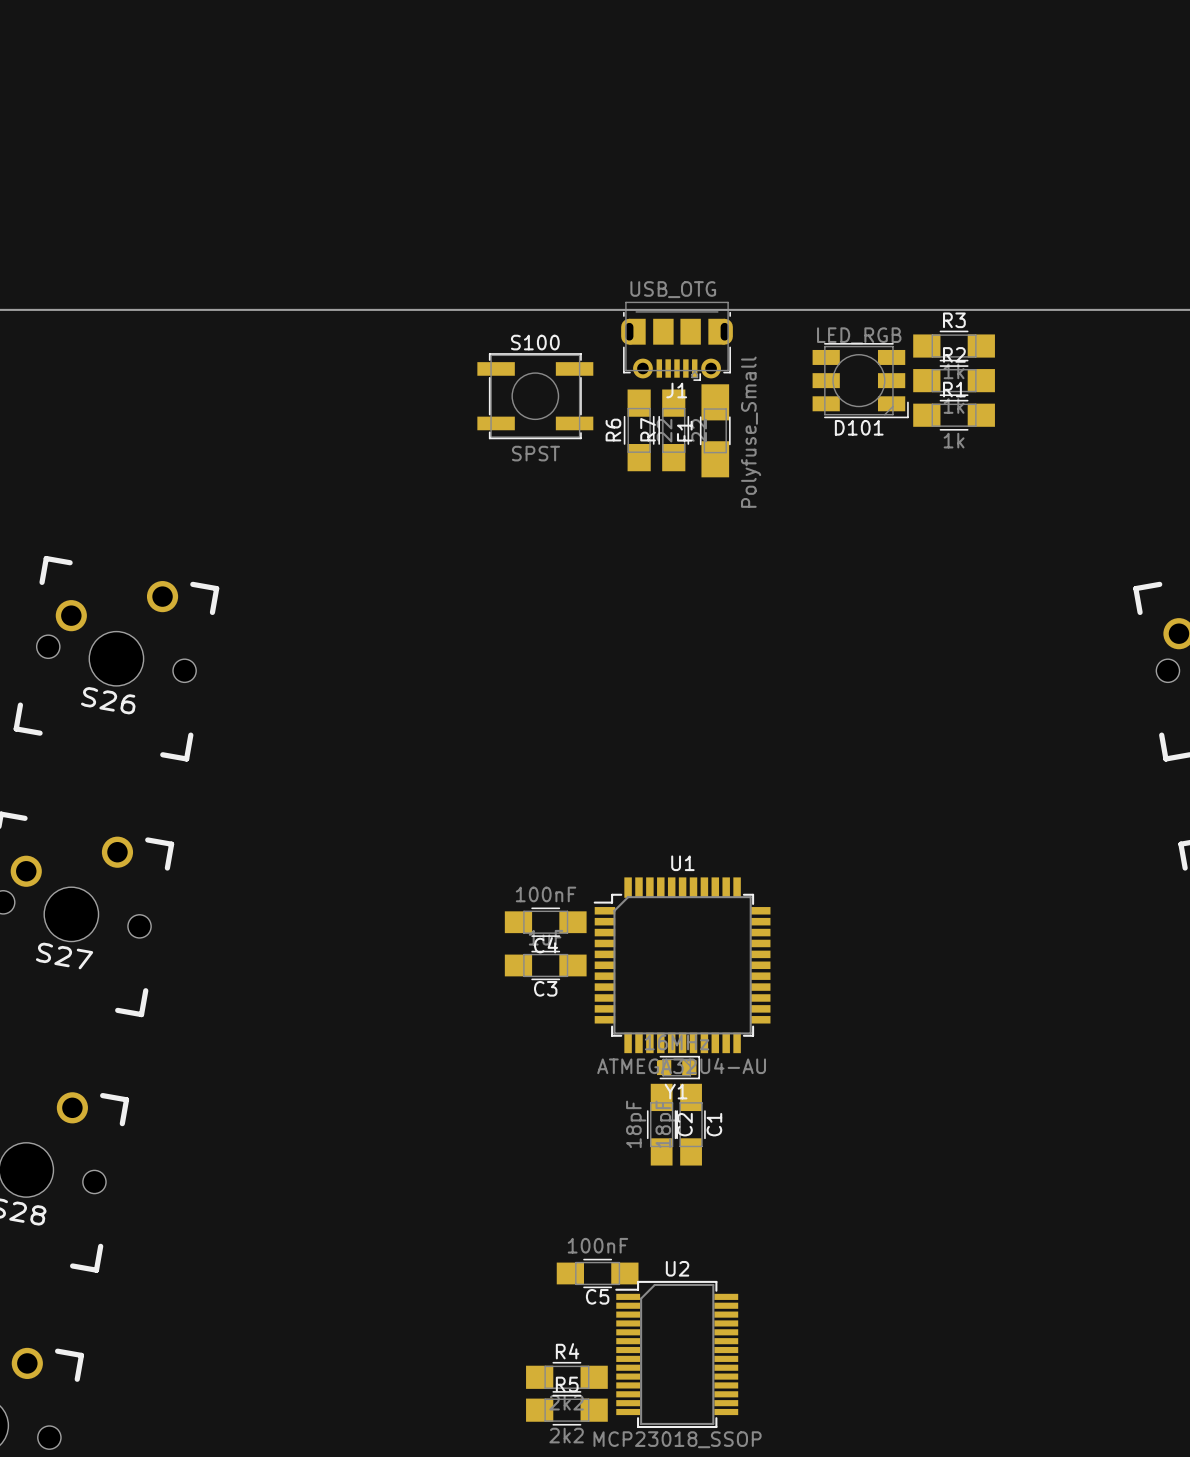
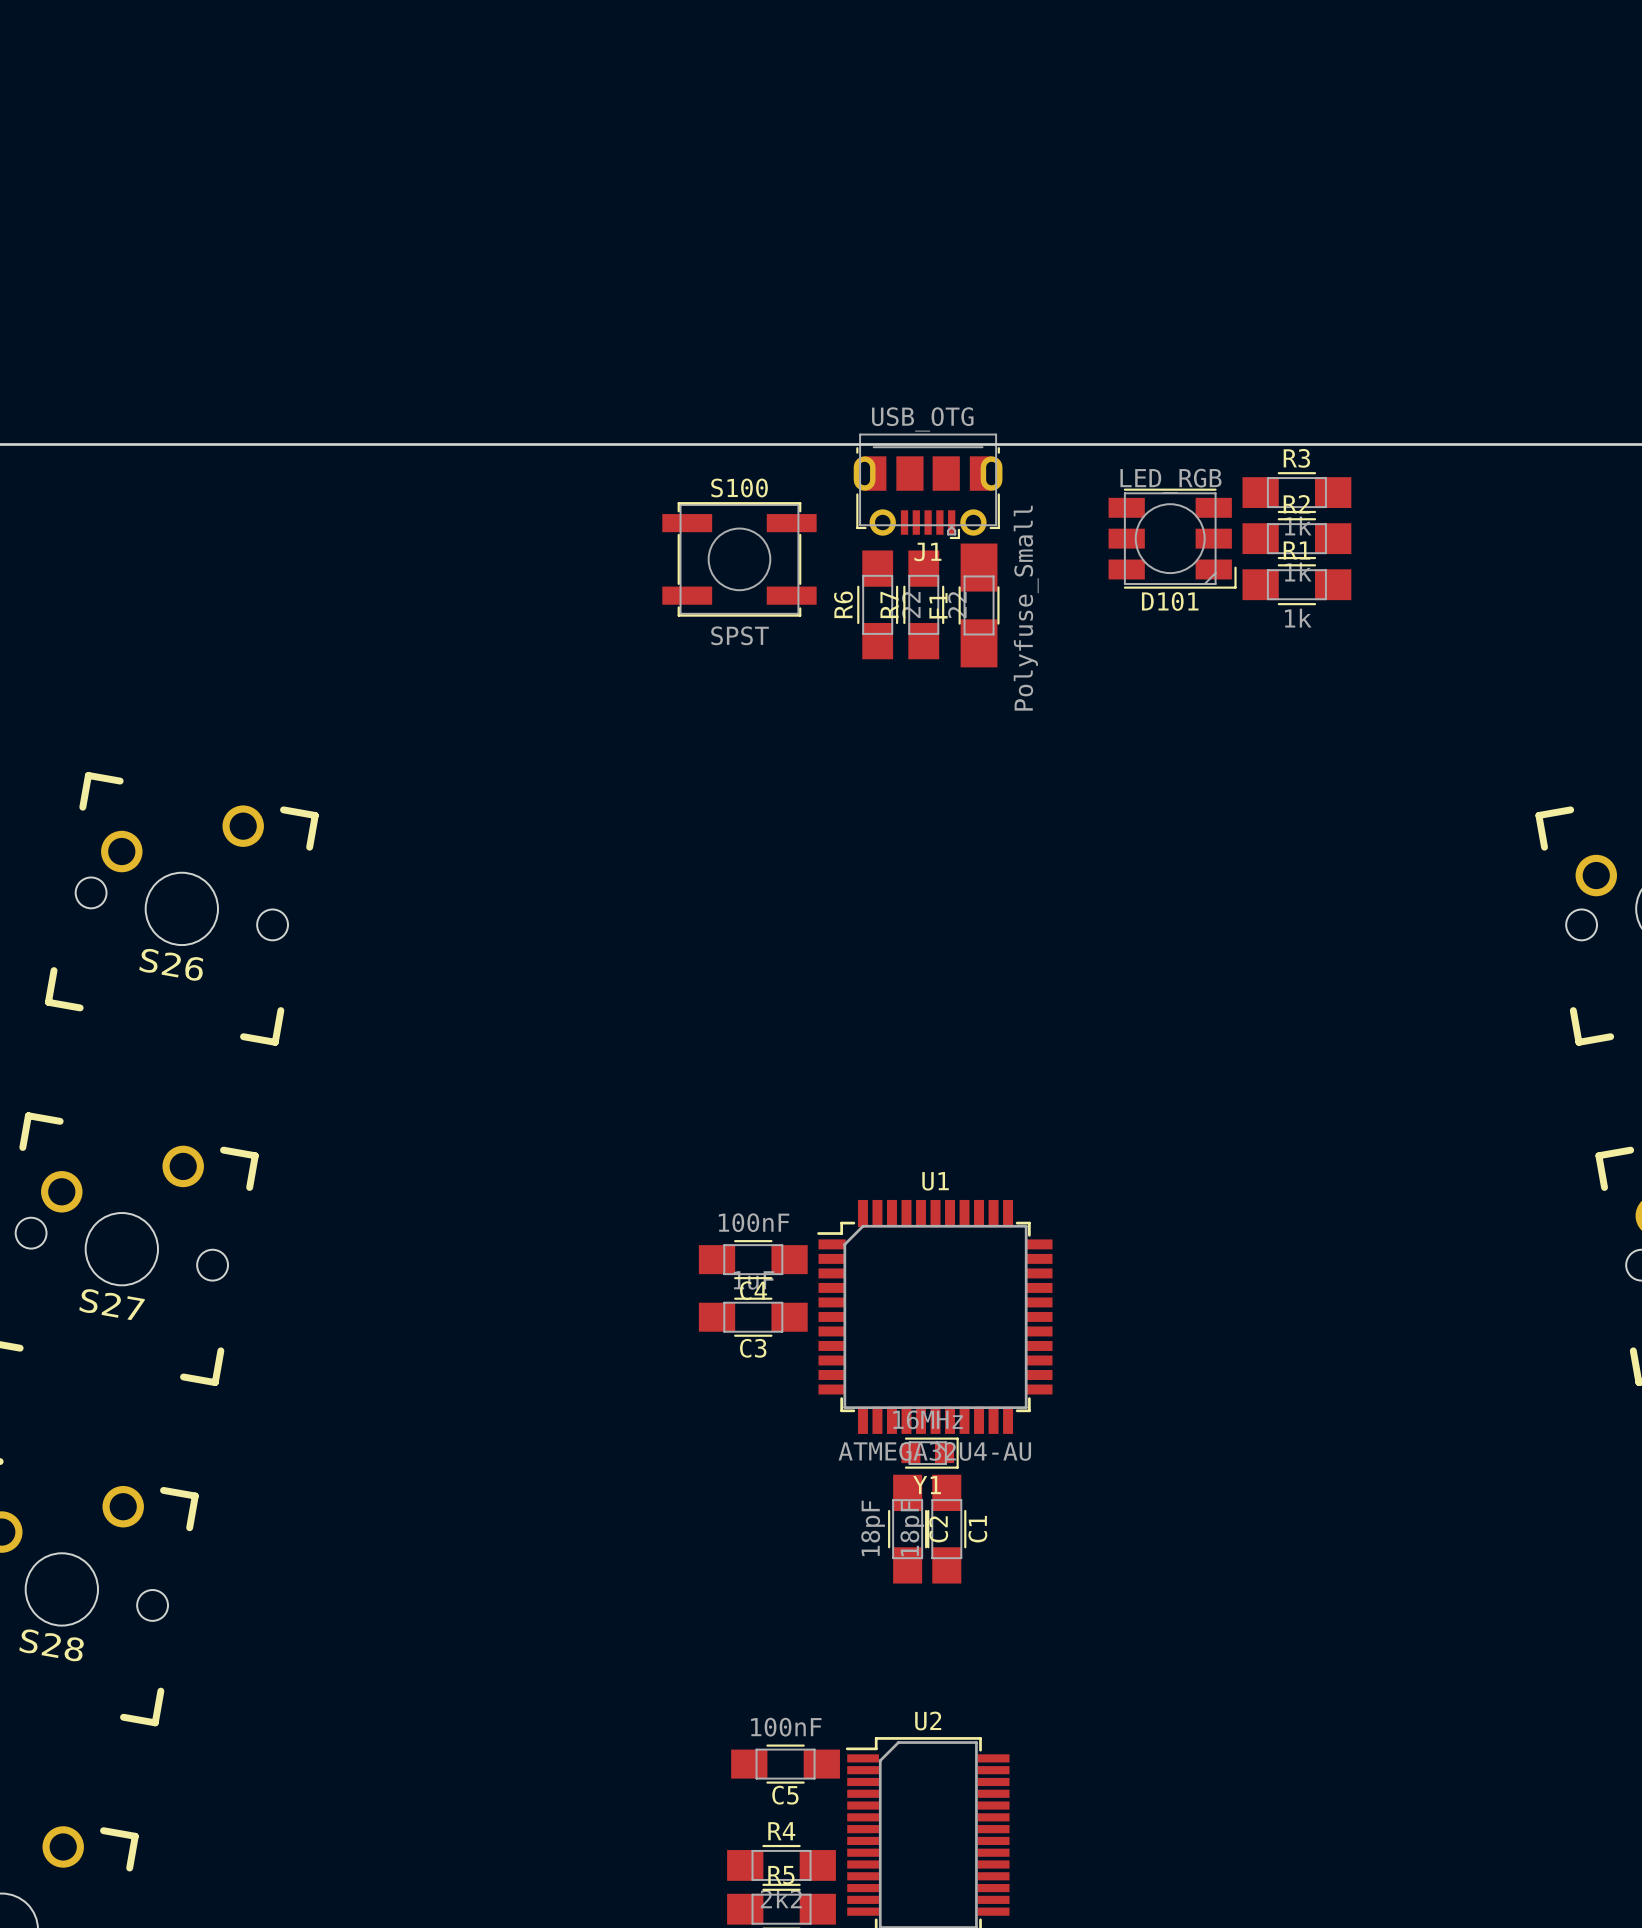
C5 position: (597, 1273) -> (785, 1764)

